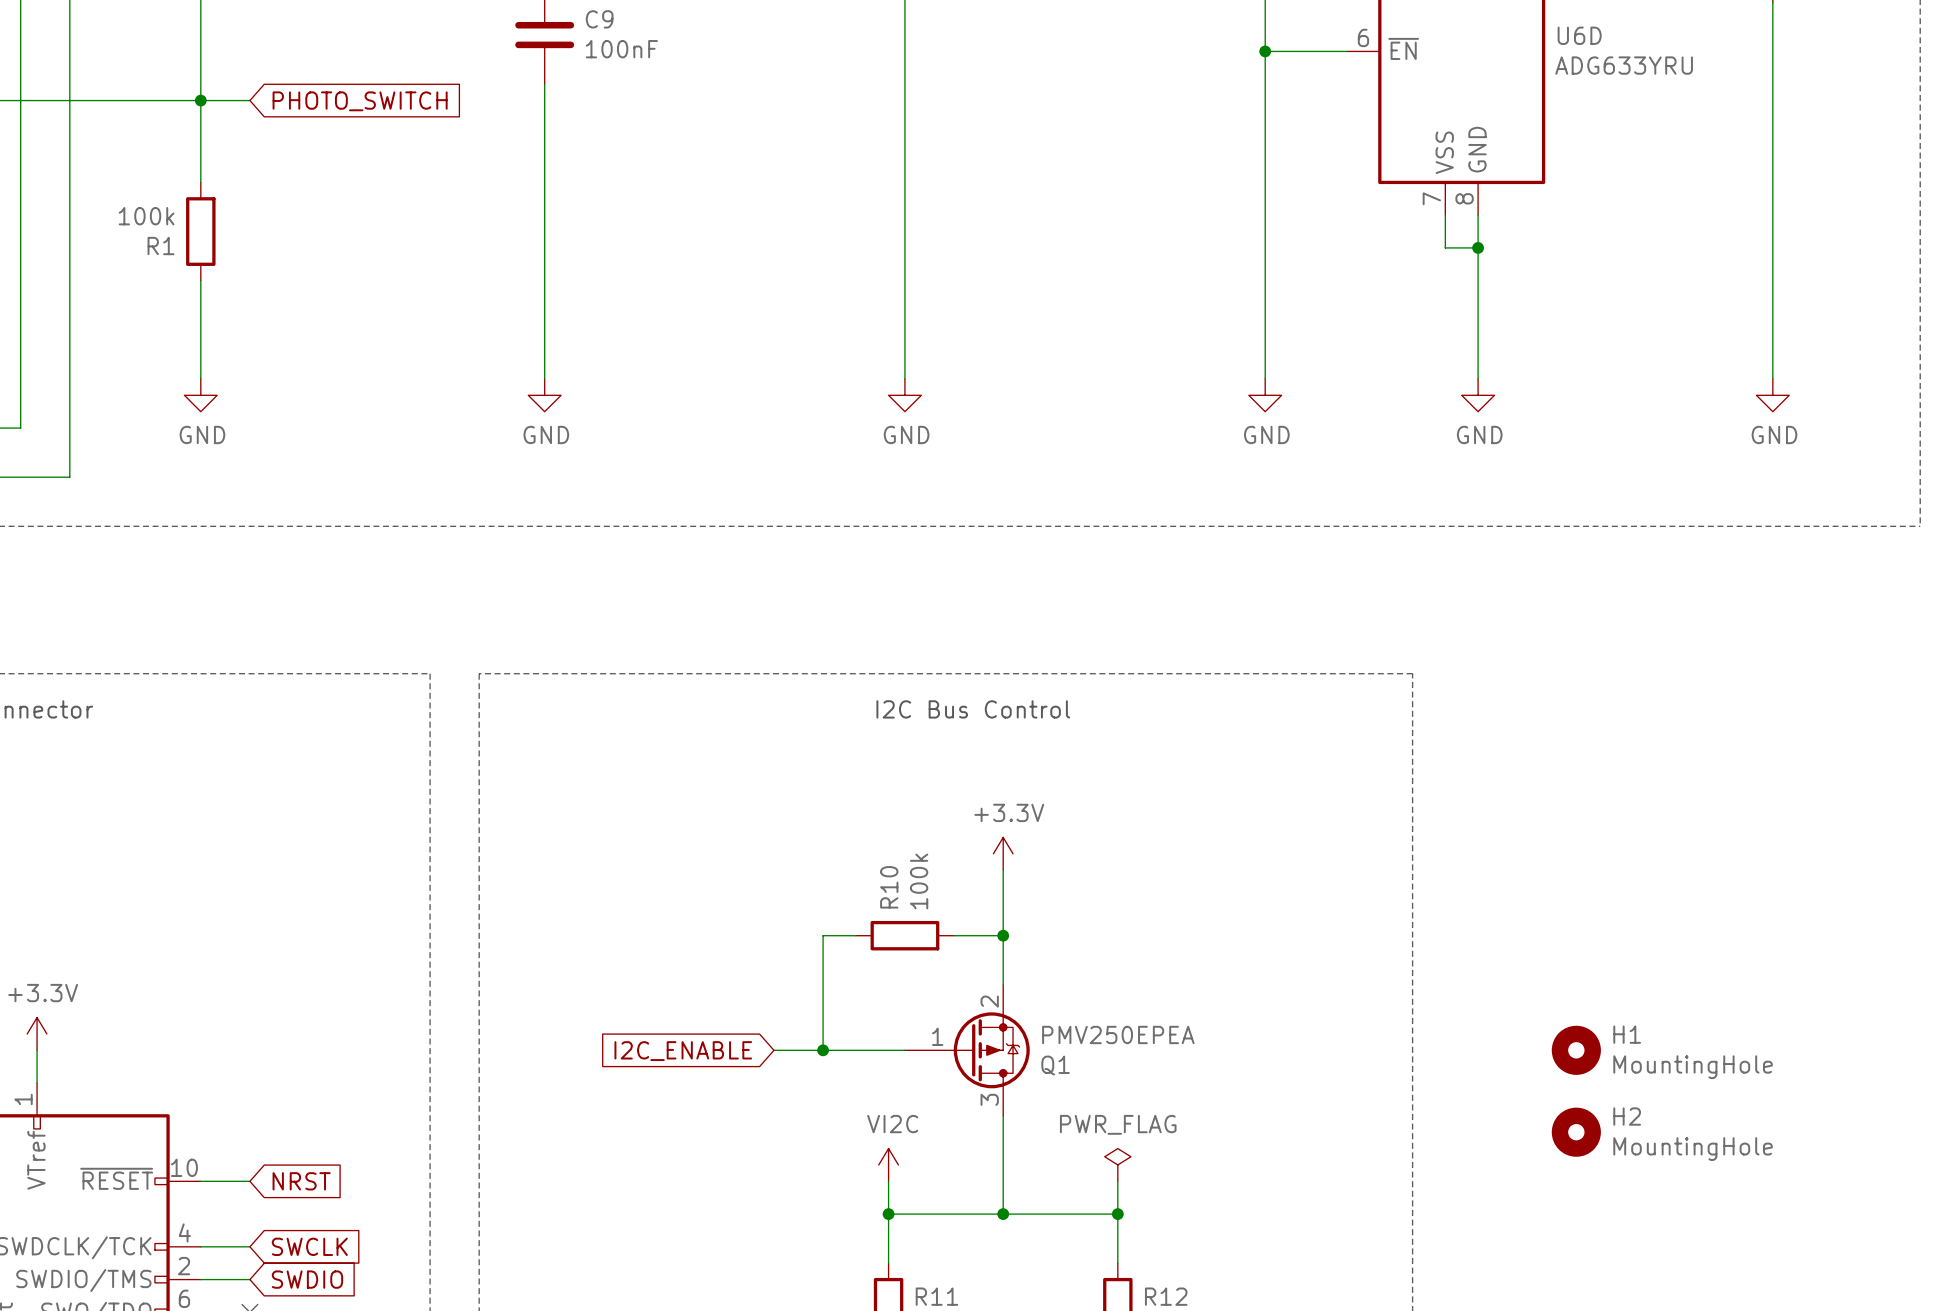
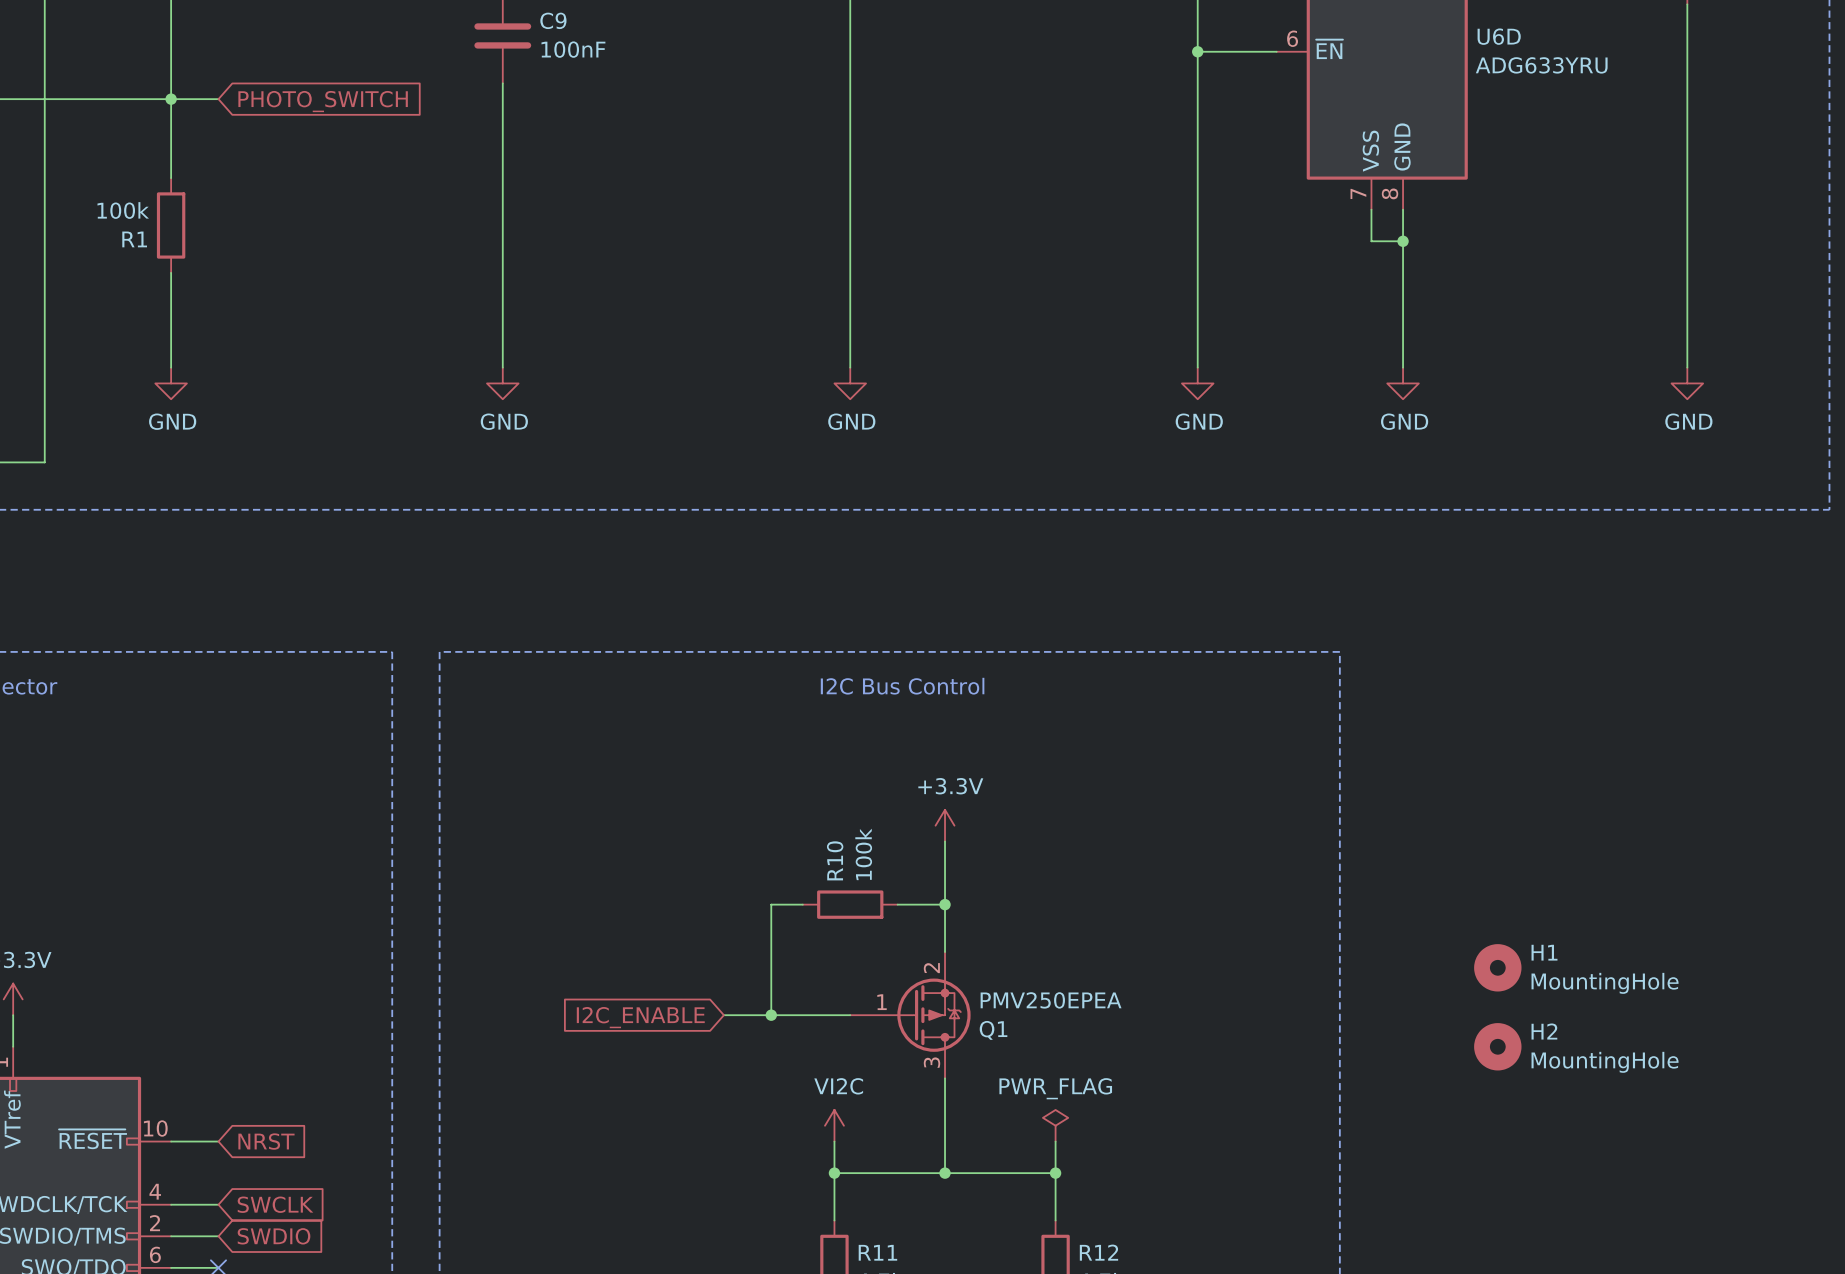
H1 position: (1576, 1050) -> (1497, 967)
H2 position: (1576, 1132) -> (1497, 1046)

